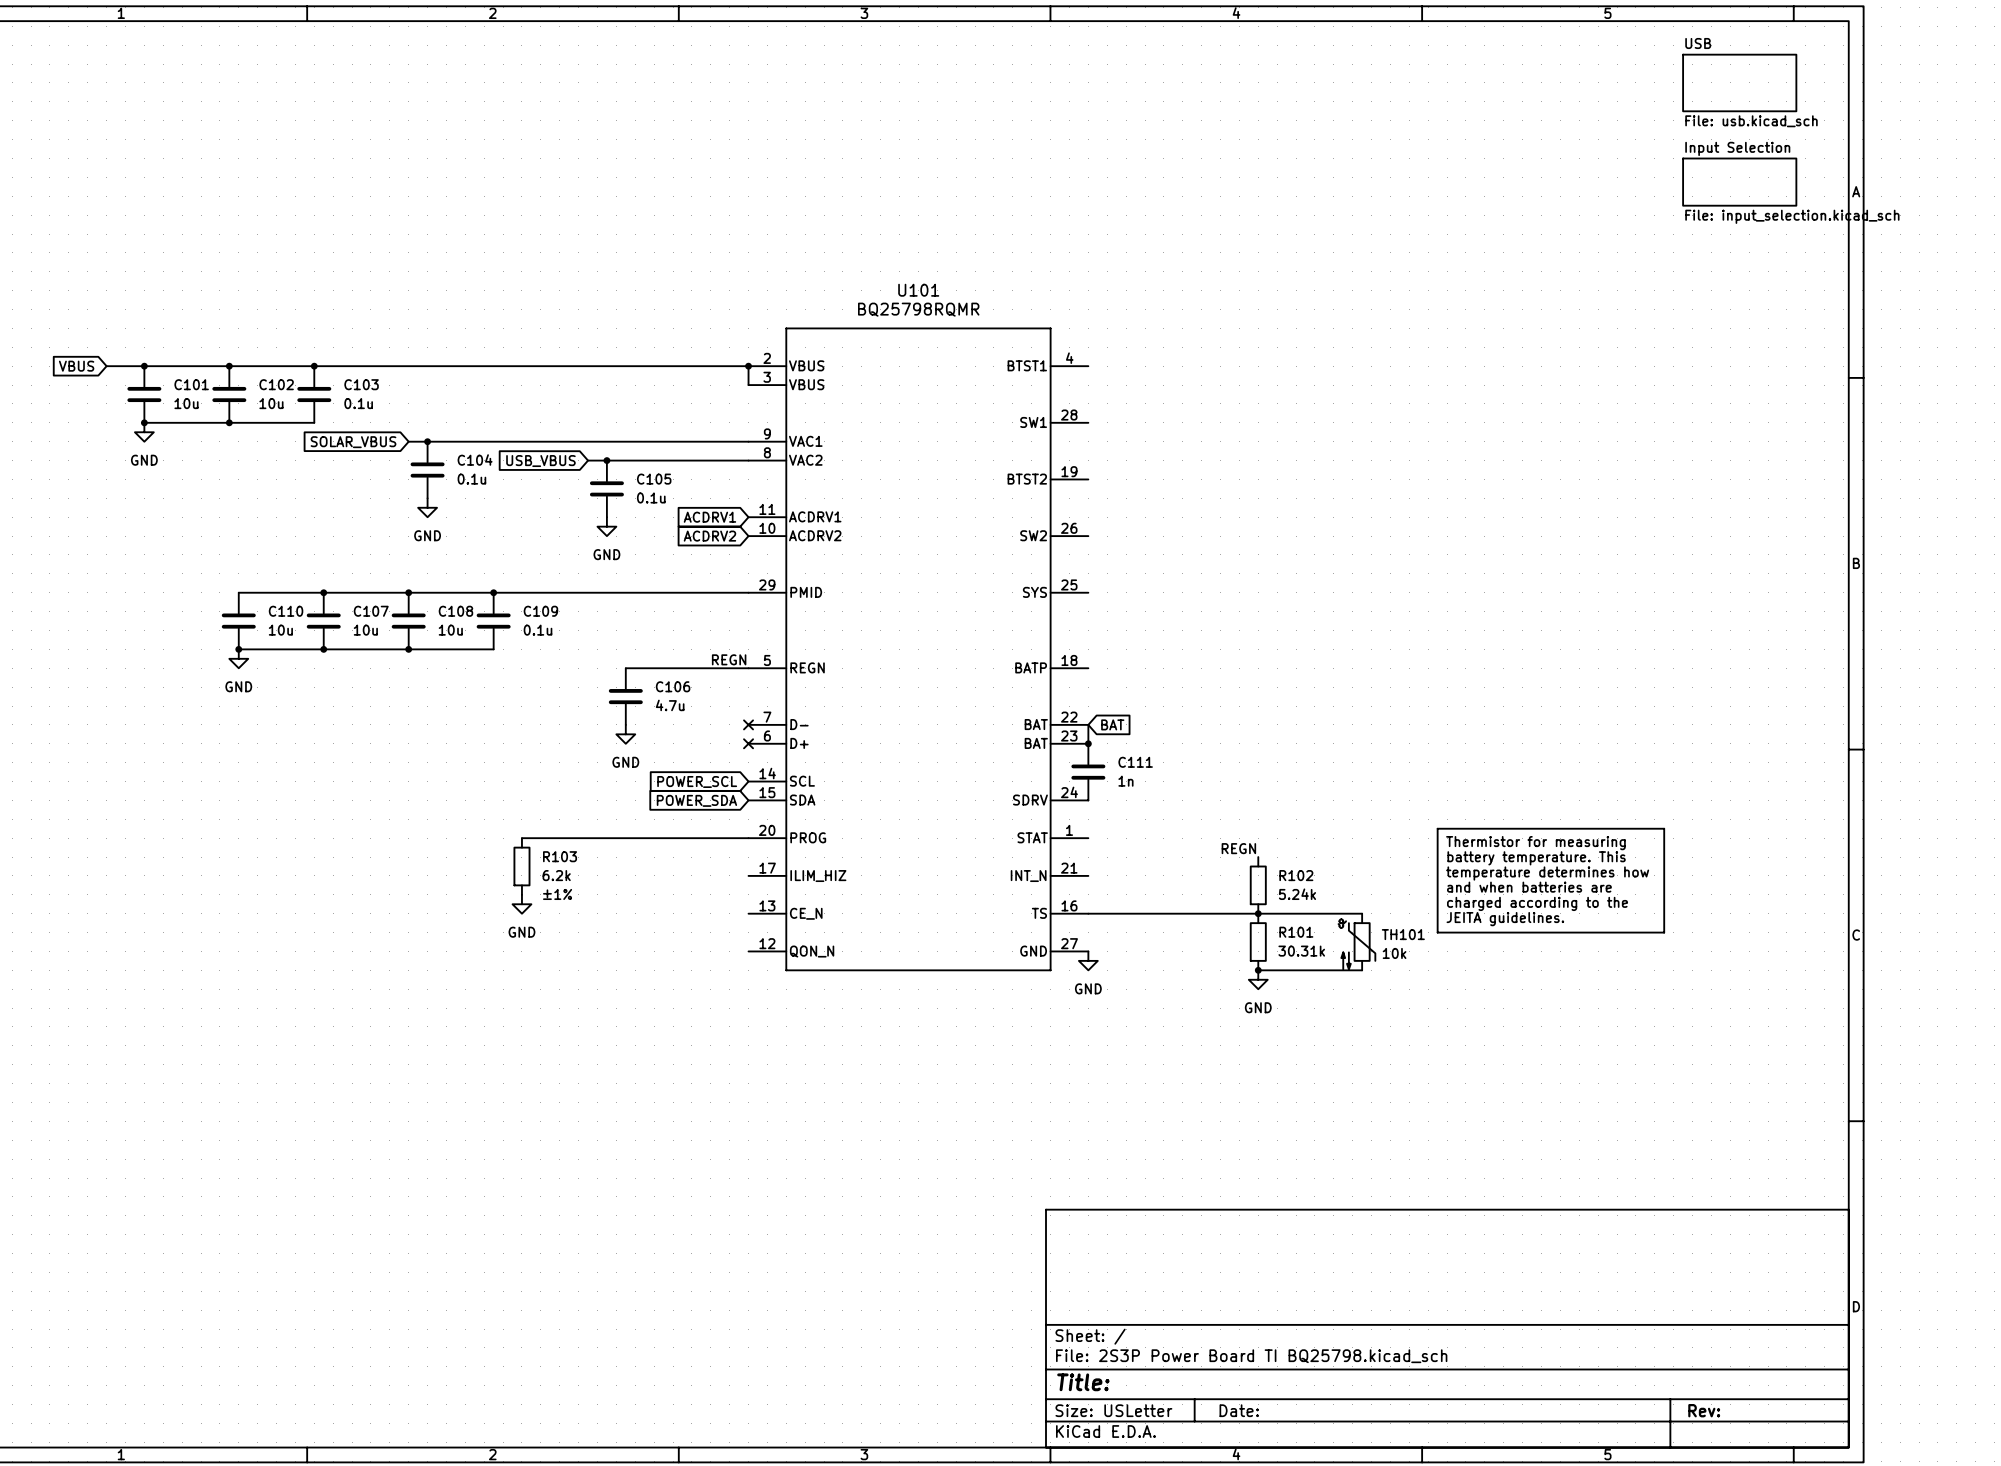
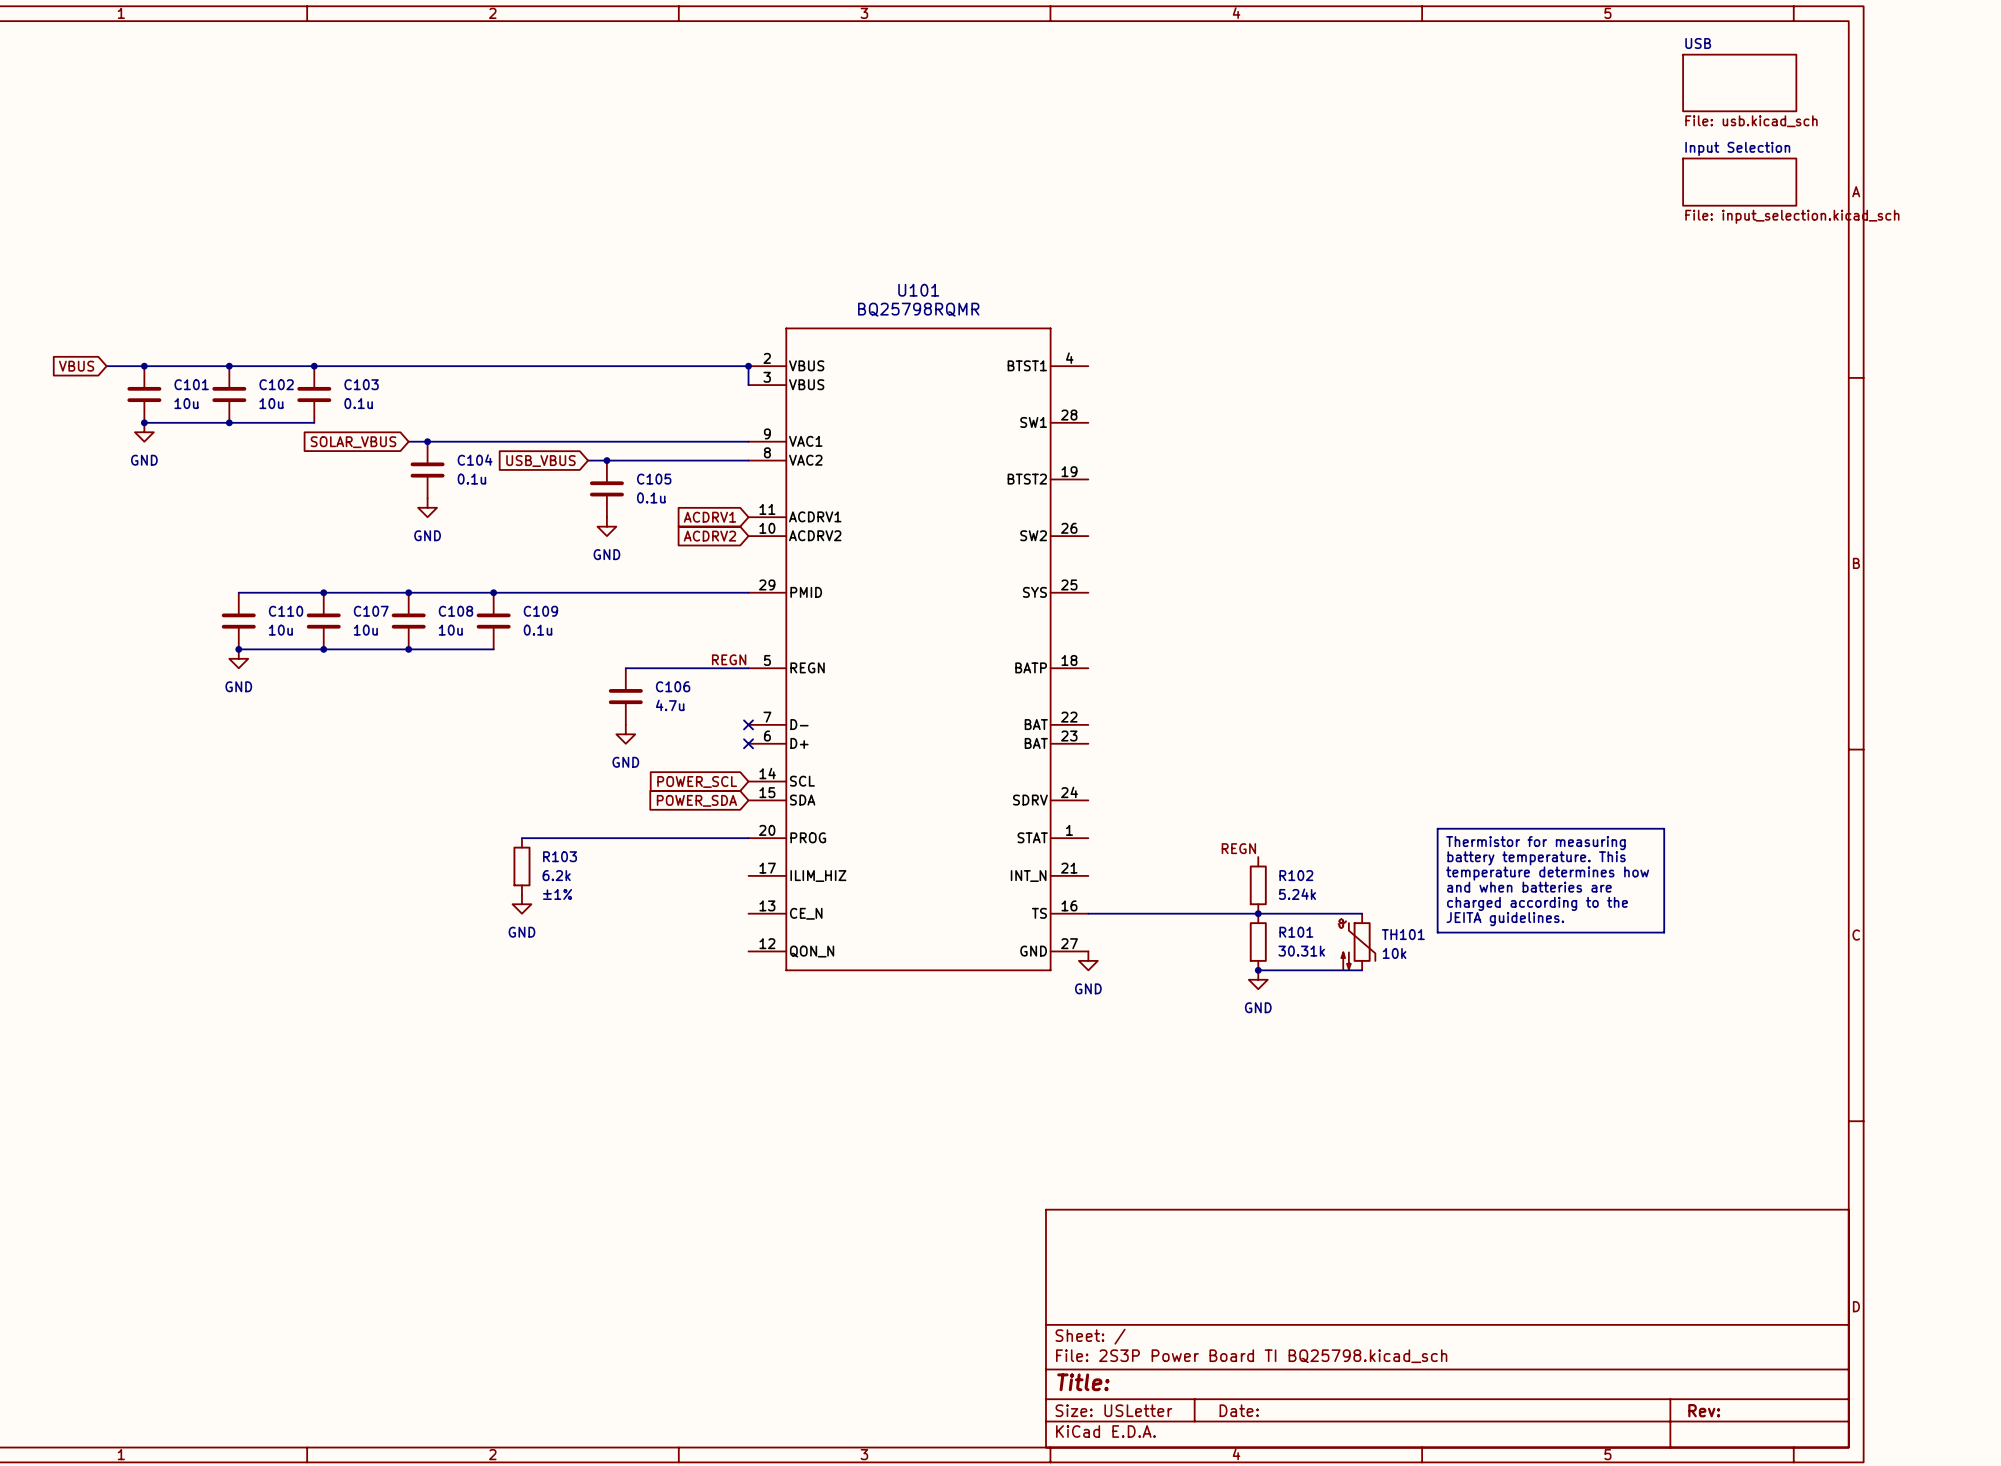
wire: (1088, 724) (1088, 743) -> none
global label: BAT (1112, 724) -> none
junction: (1088, 743) -> none
C111: 1n (1088, 772) -> none

